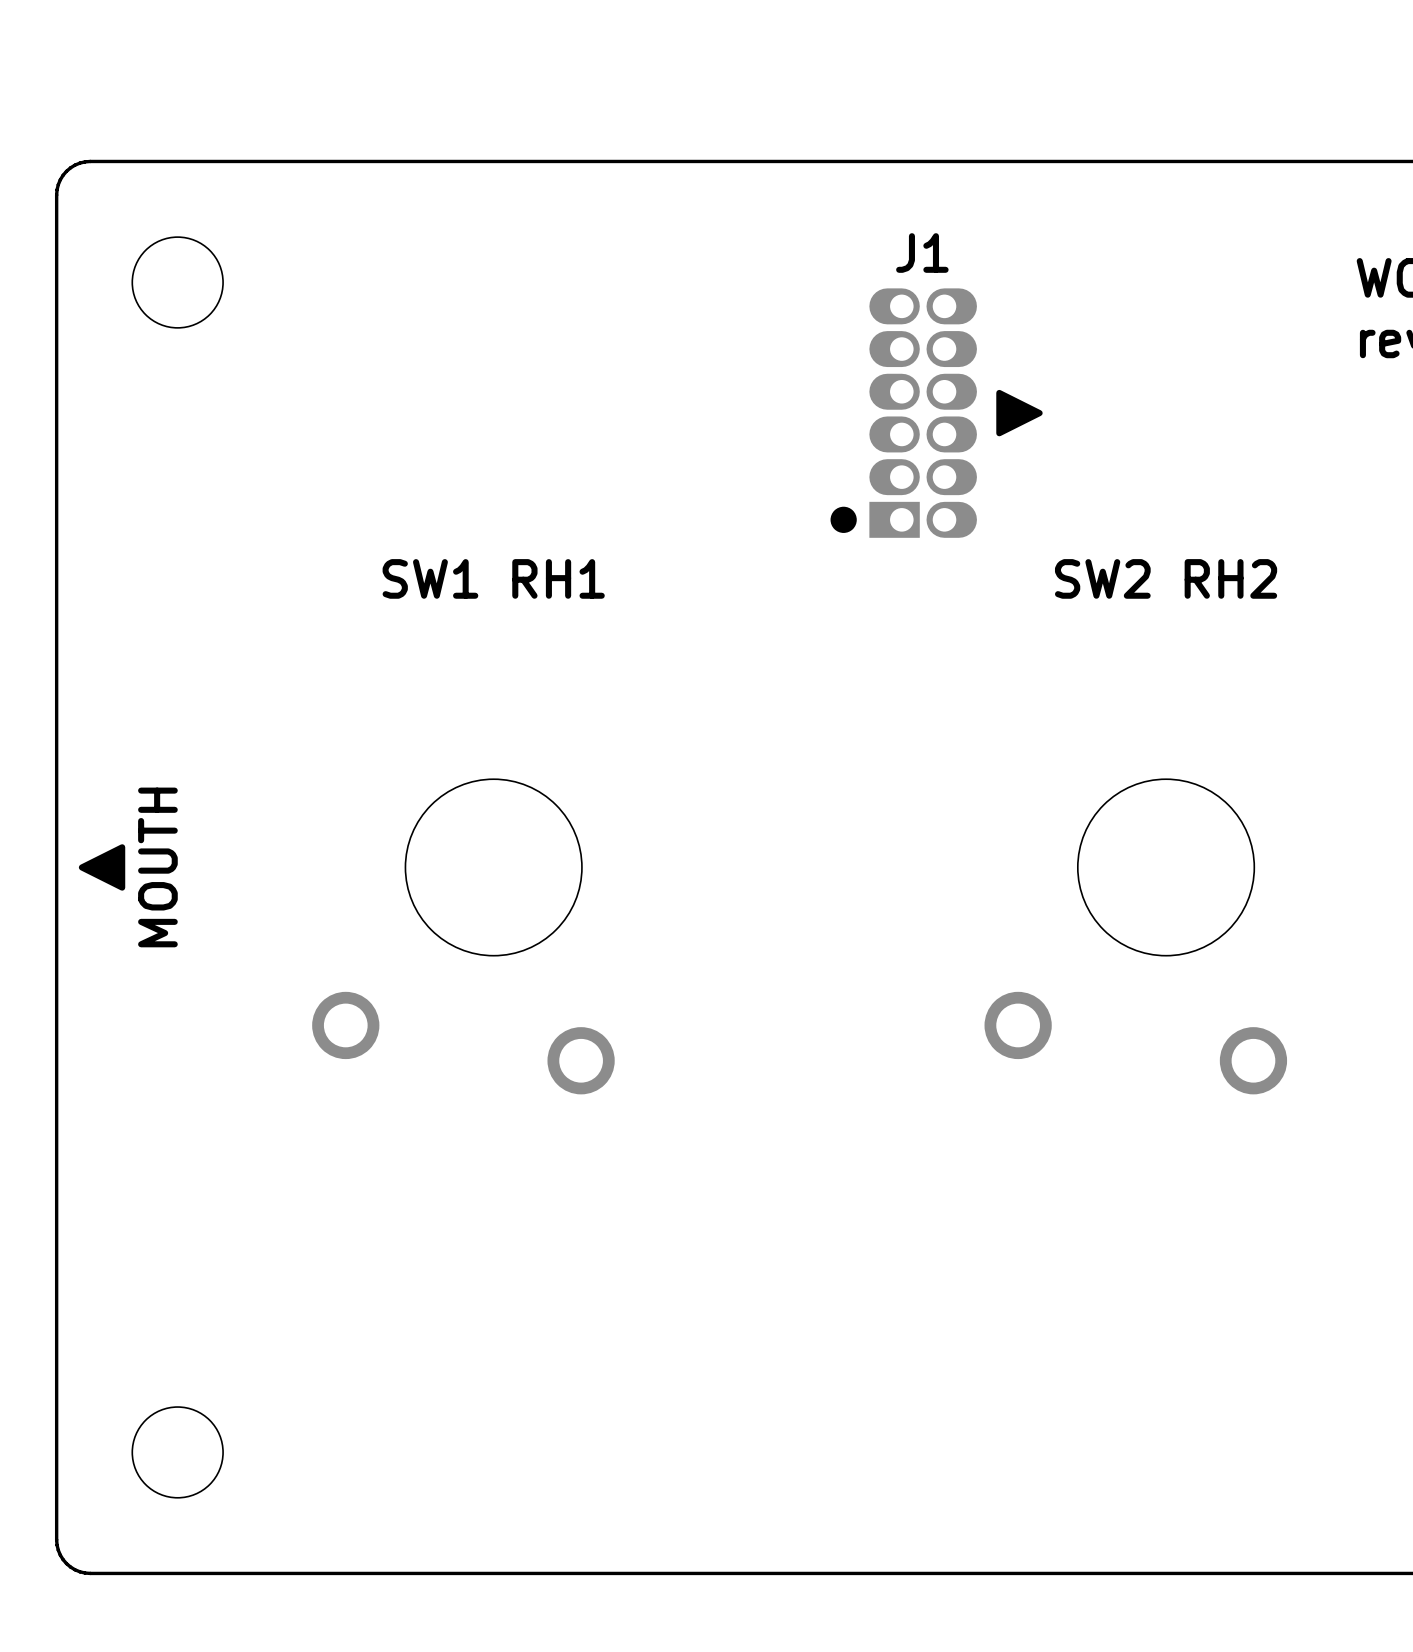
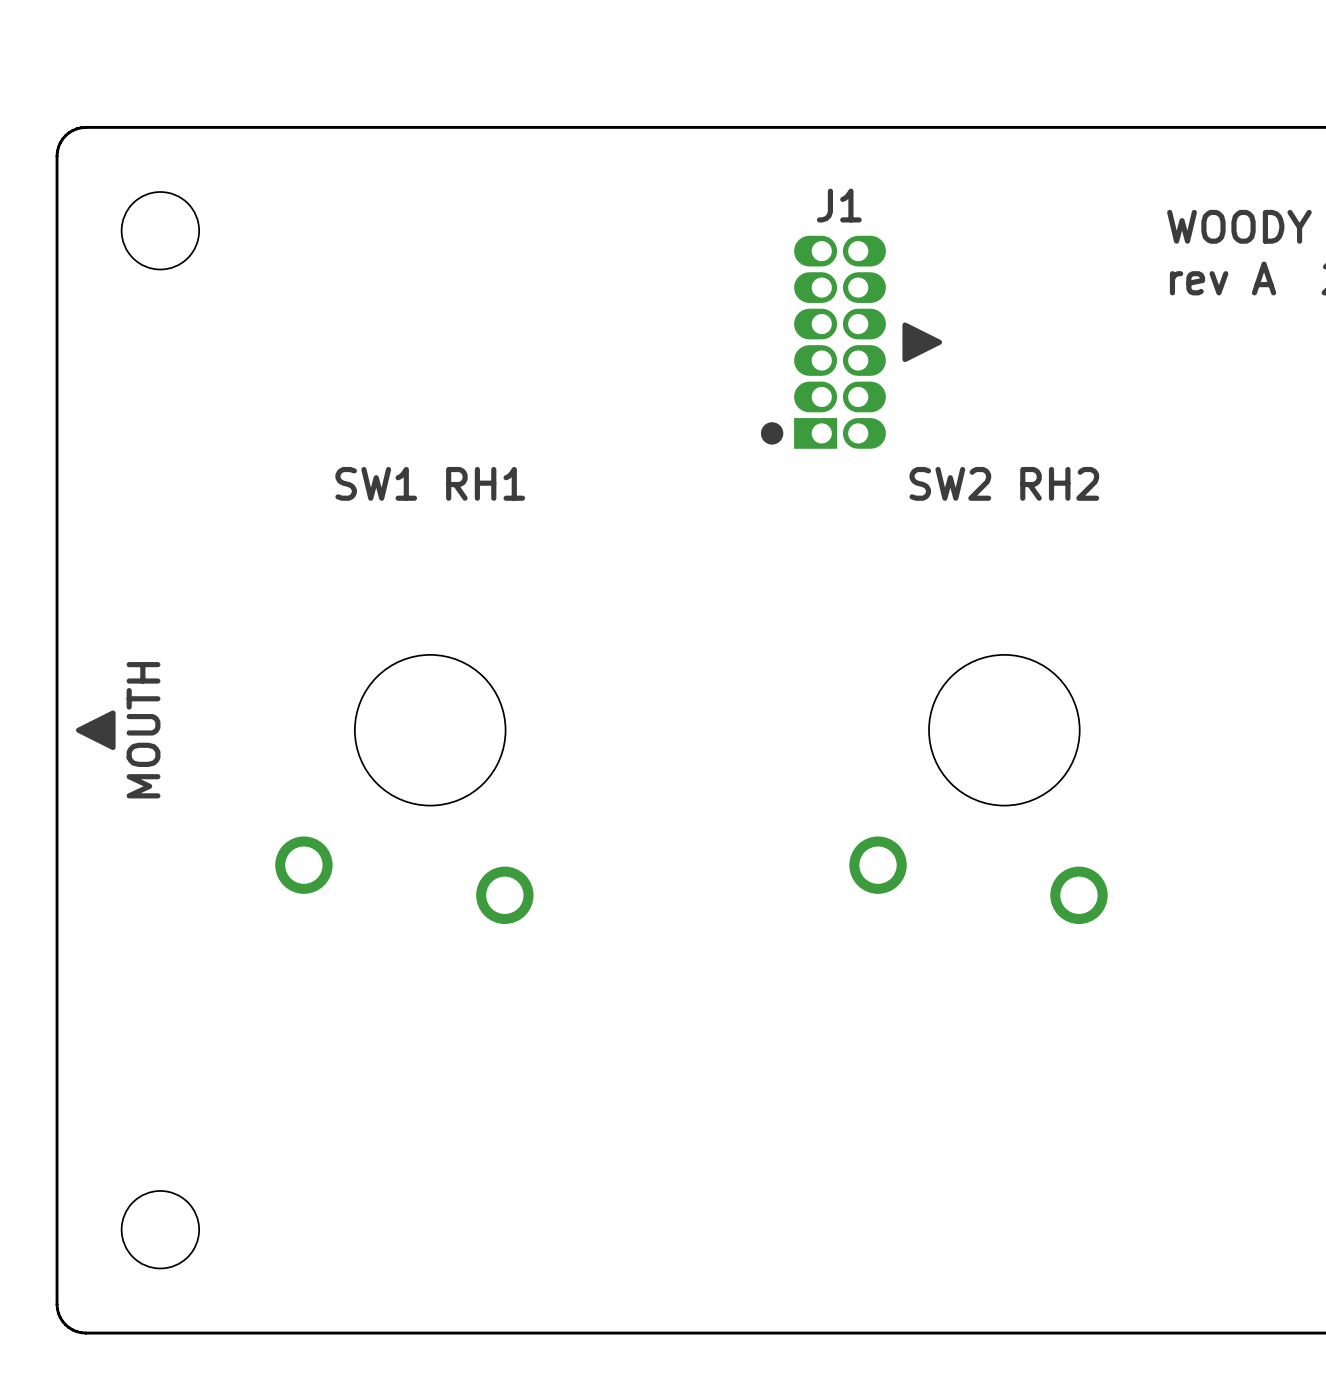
text position: J1 (922, 253) -> J1 (839, 205)
part position: (923, 413) -> (840, 342)
drawing position: (1019, 413) -> (922, 342)
drawing position: (843, 519) -> (772, 433)

